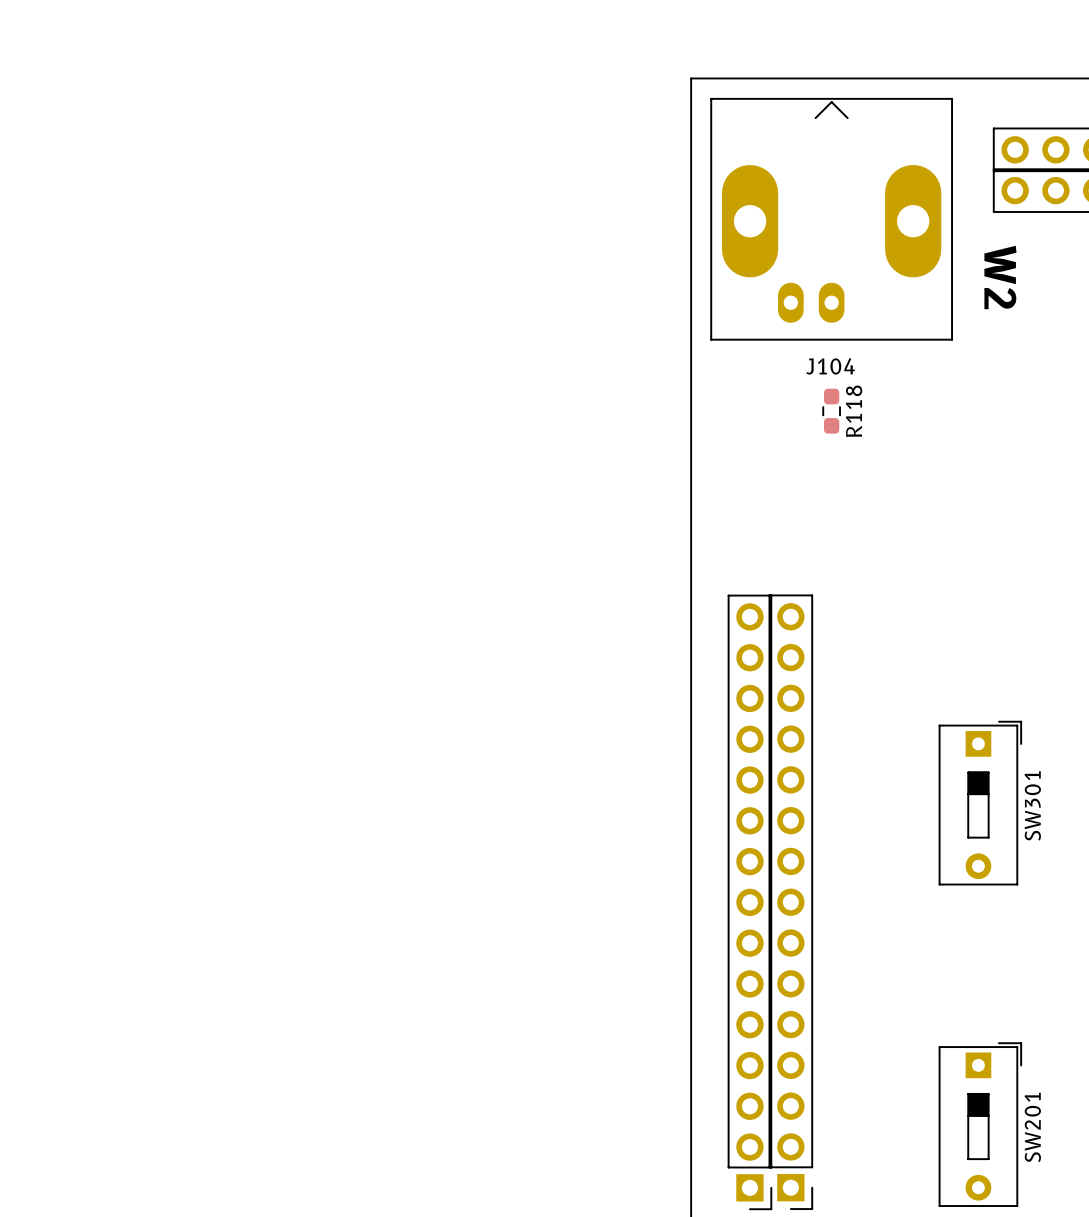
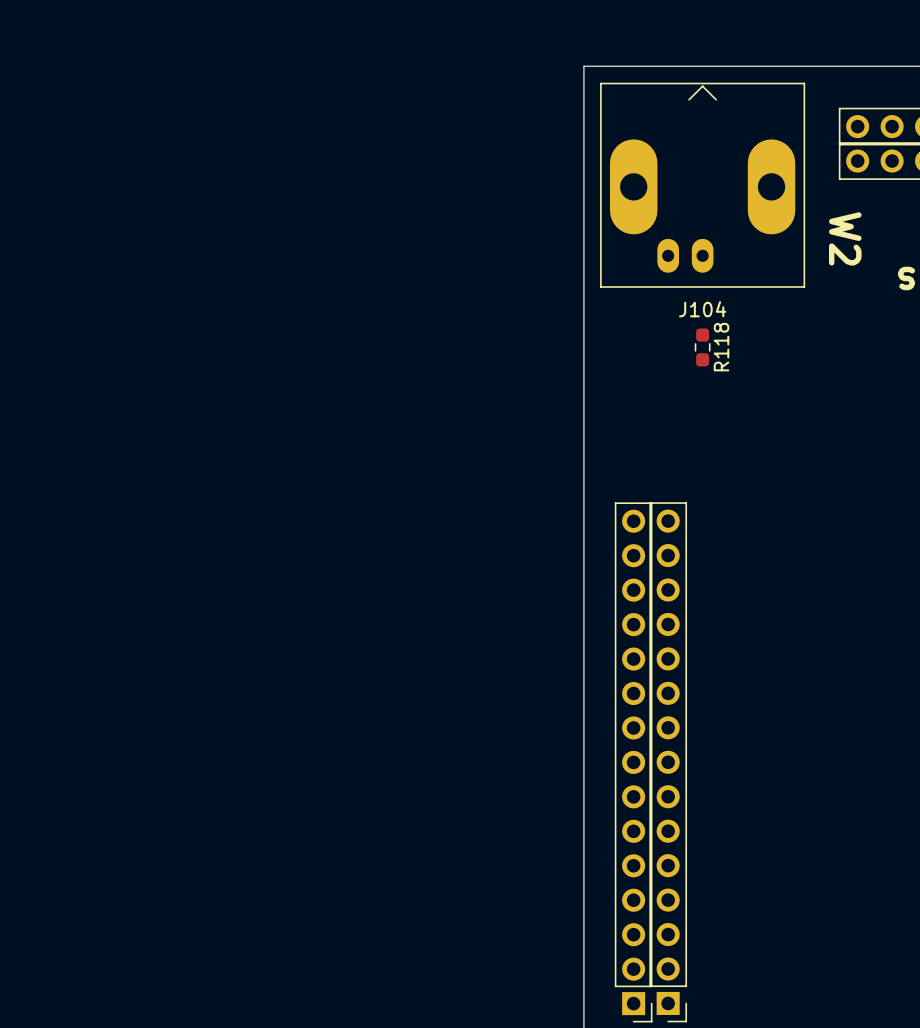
SW301: (980, 803) -> none
SW201: (980, 1124) -> none

